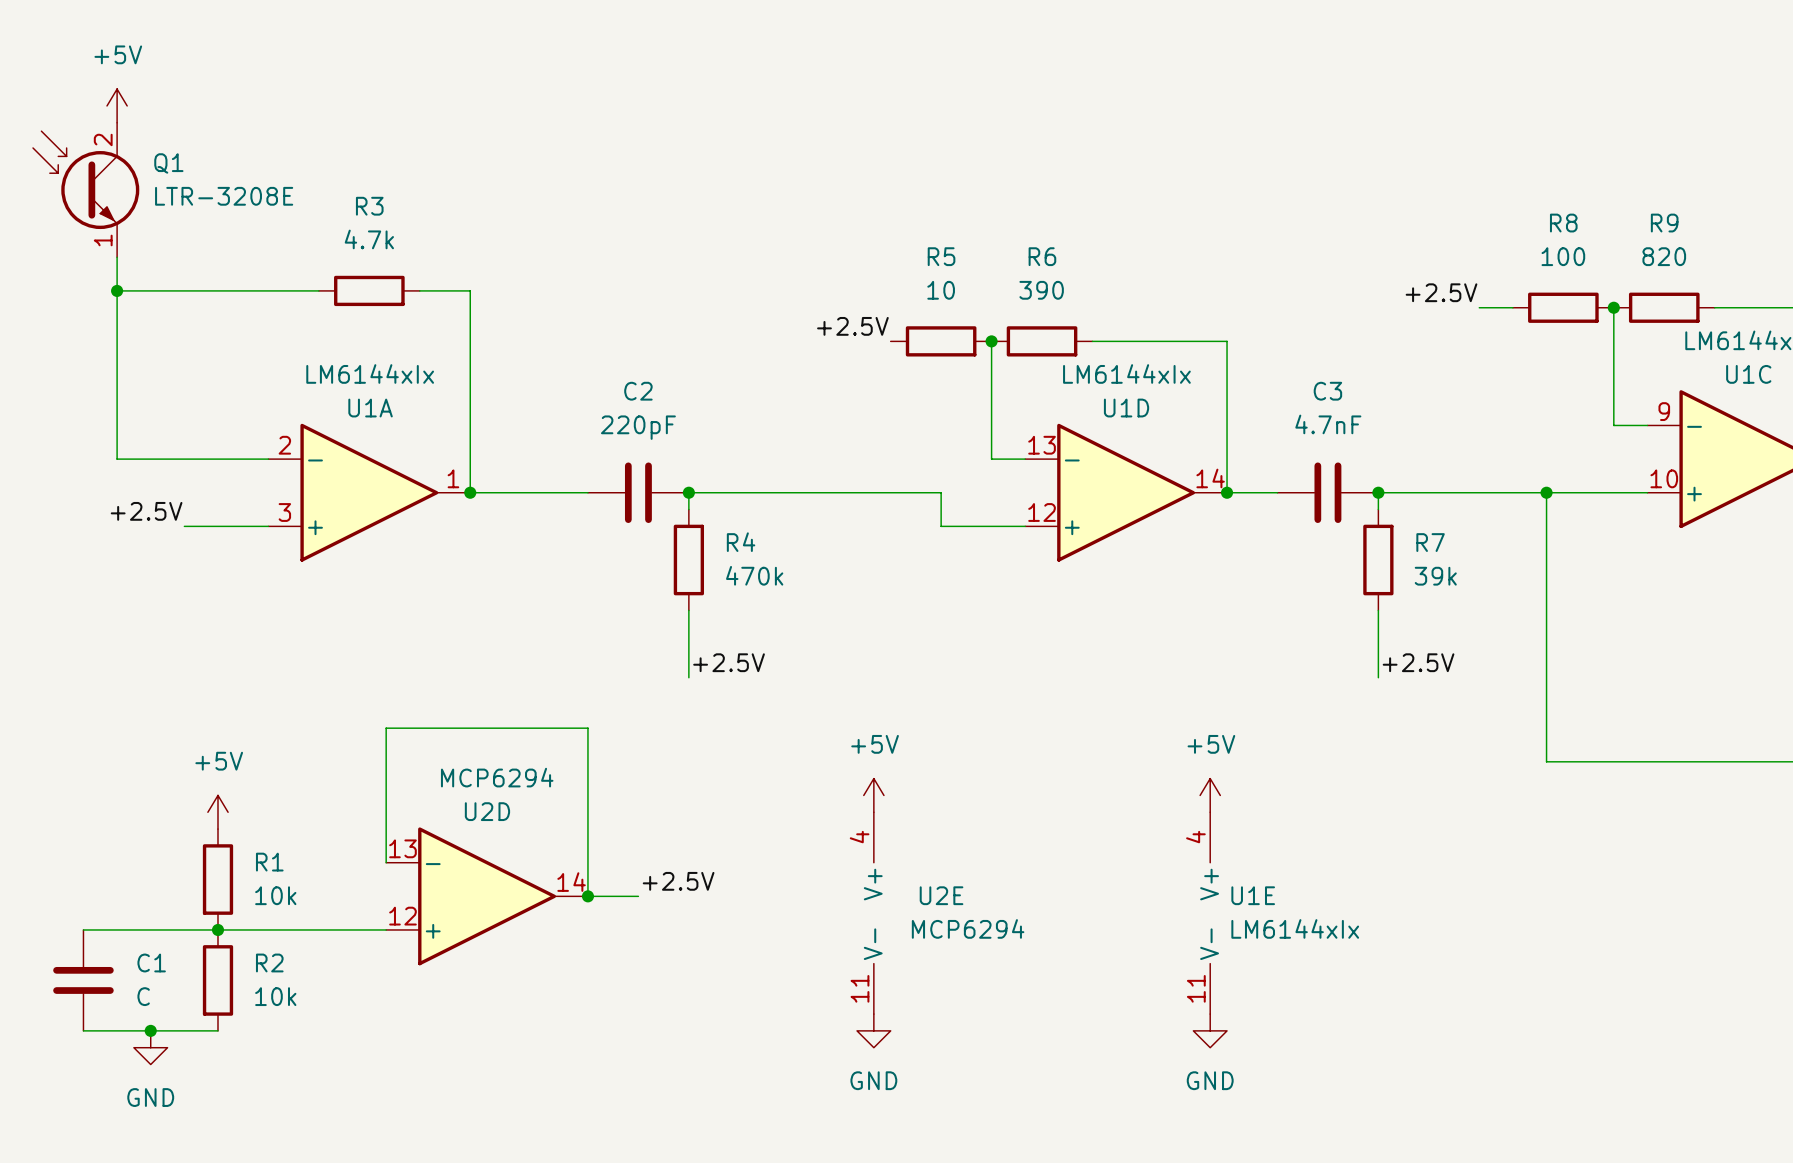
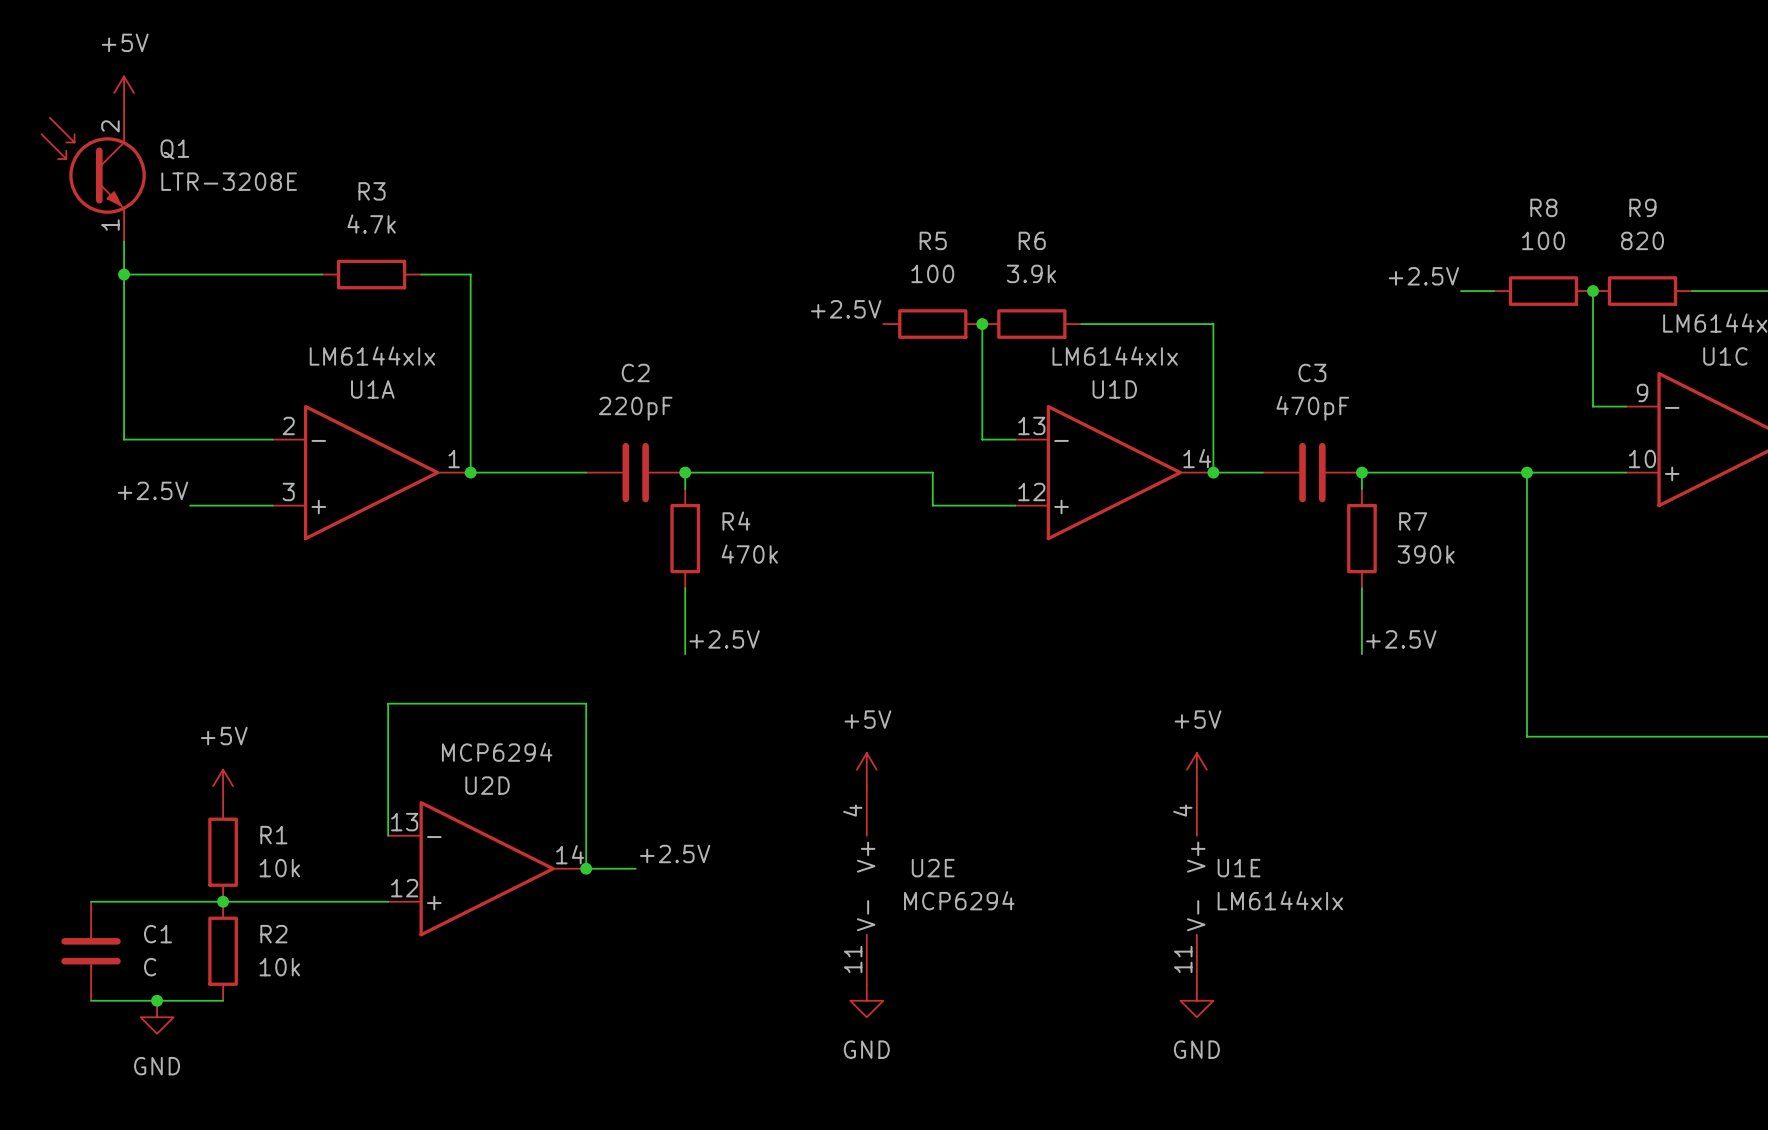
R5 value: 10 (941, 290) -> 100 (932, 273)
R6 value: 390 (1041, 290) -> 3.9k (1031, 273)
C3 value: 4.7nF (1328, 424) -> 470pF (1312, 408)
R7 value: 39k (1435, 576) -> 390k (1426, 554)

